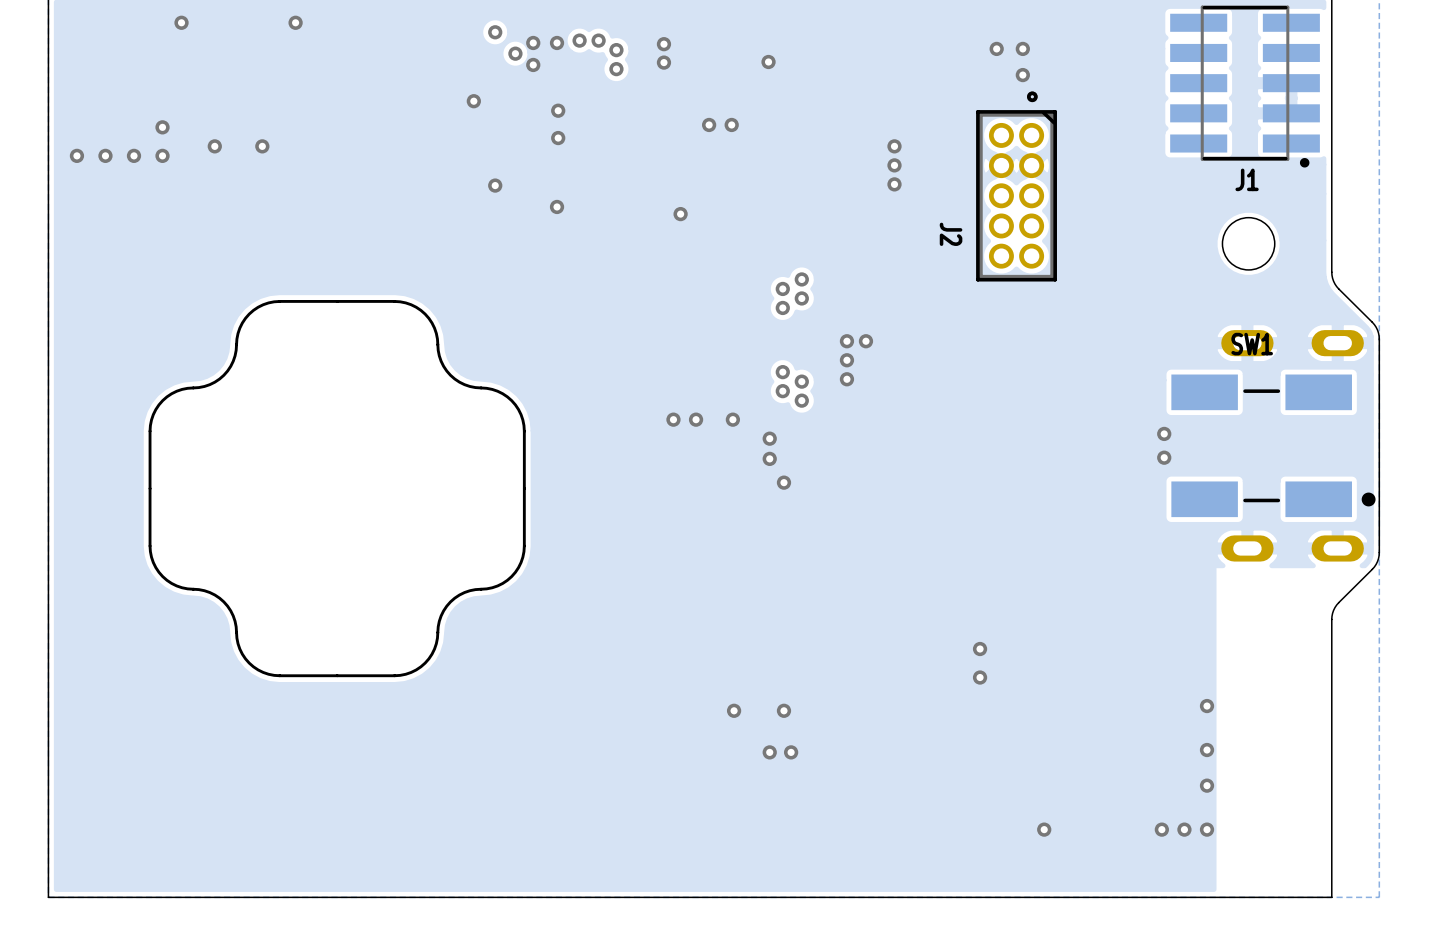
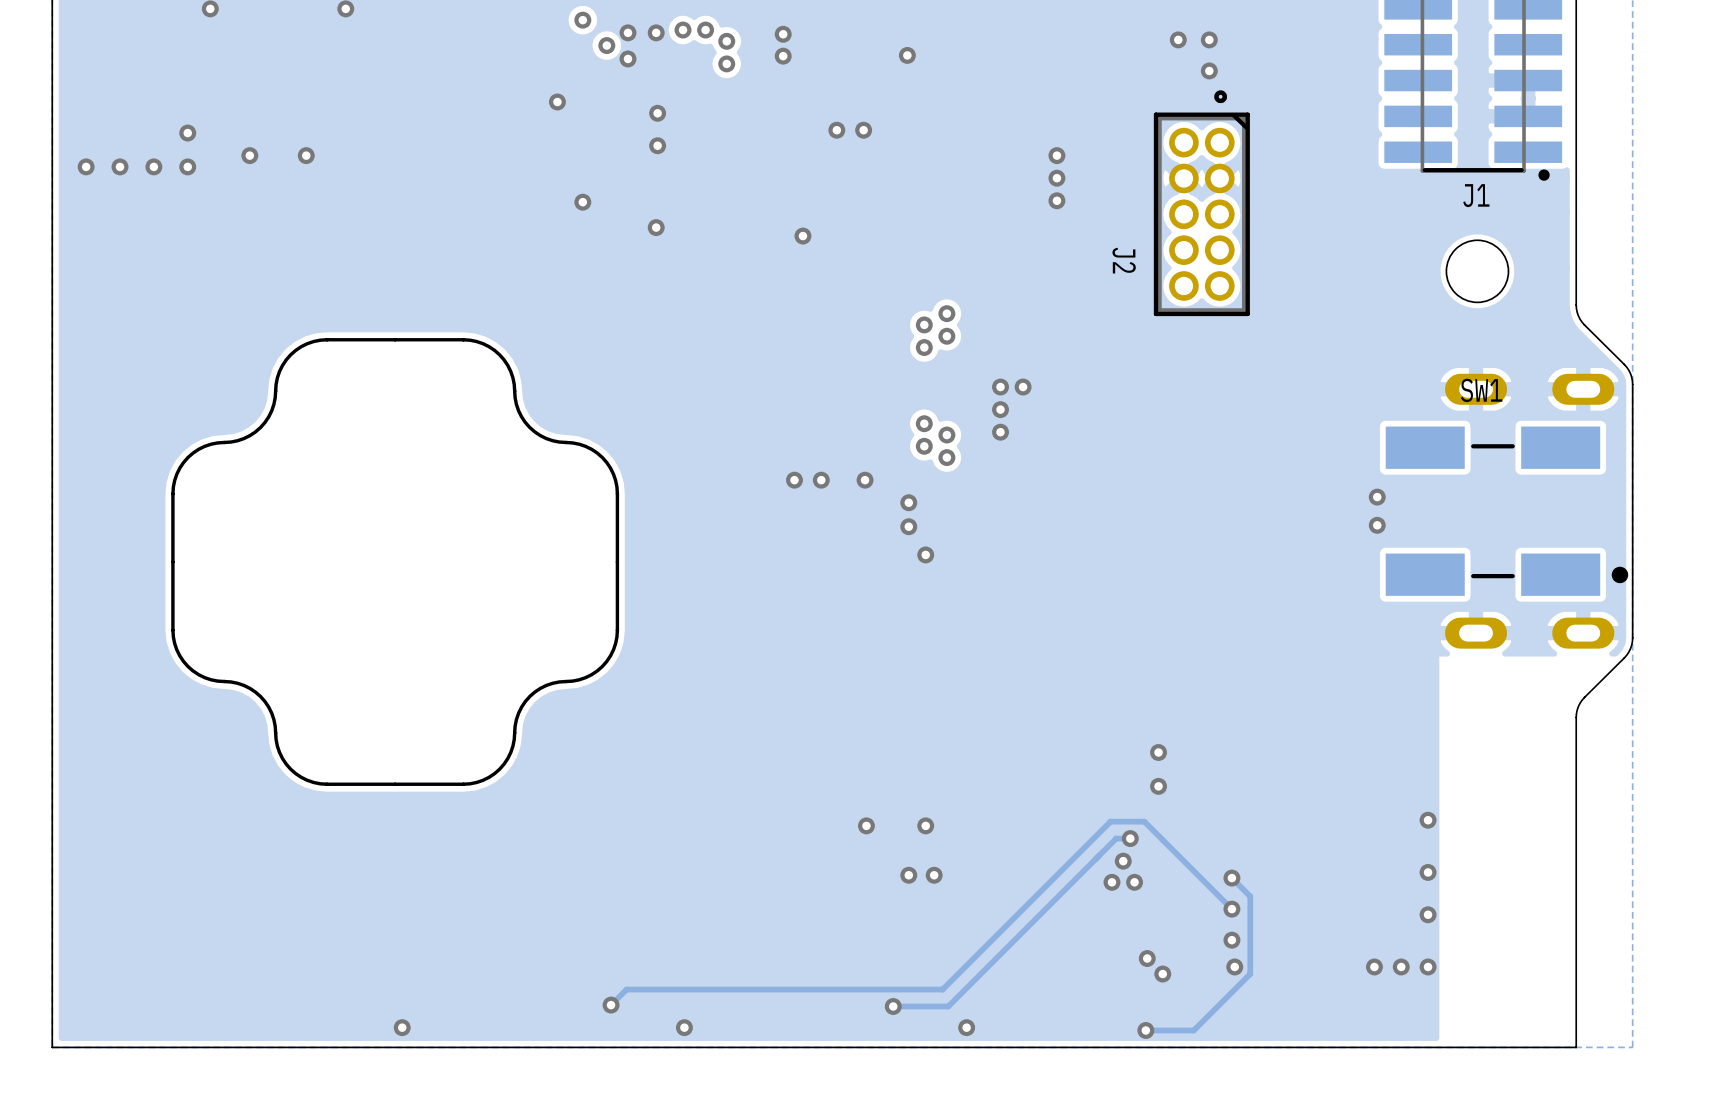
track: none -> (1130, 838) (1116, 838) (948, 1006) (893, 1006)
via: none -> (1130, 838)
via: none -> (1123, 861)
track: none -> (1231, 878) (1250, 896) (1250, 974) (1193, 1030) (1145, 1030)
via: none -> (1231, 878)
via: none -> (1111, 882)
via: none -> (1134, 882)
track: none -> (1231, 909) (1144, 821) (1110, 821) (942, 989) (626, 989) (611, 1005)
via: none -> (1231, 909)
via: none -> (1231, 940)
via: none -> (1147, 958)
via: none -> (1162, 974)
via: none -> (611, 1005)
via: none -> (893, 1006)
via: none -> (402, 1027)
via: none -> (684, 1027)
via: none -> (966, 1027)
via: none -> (1145, 1030)

